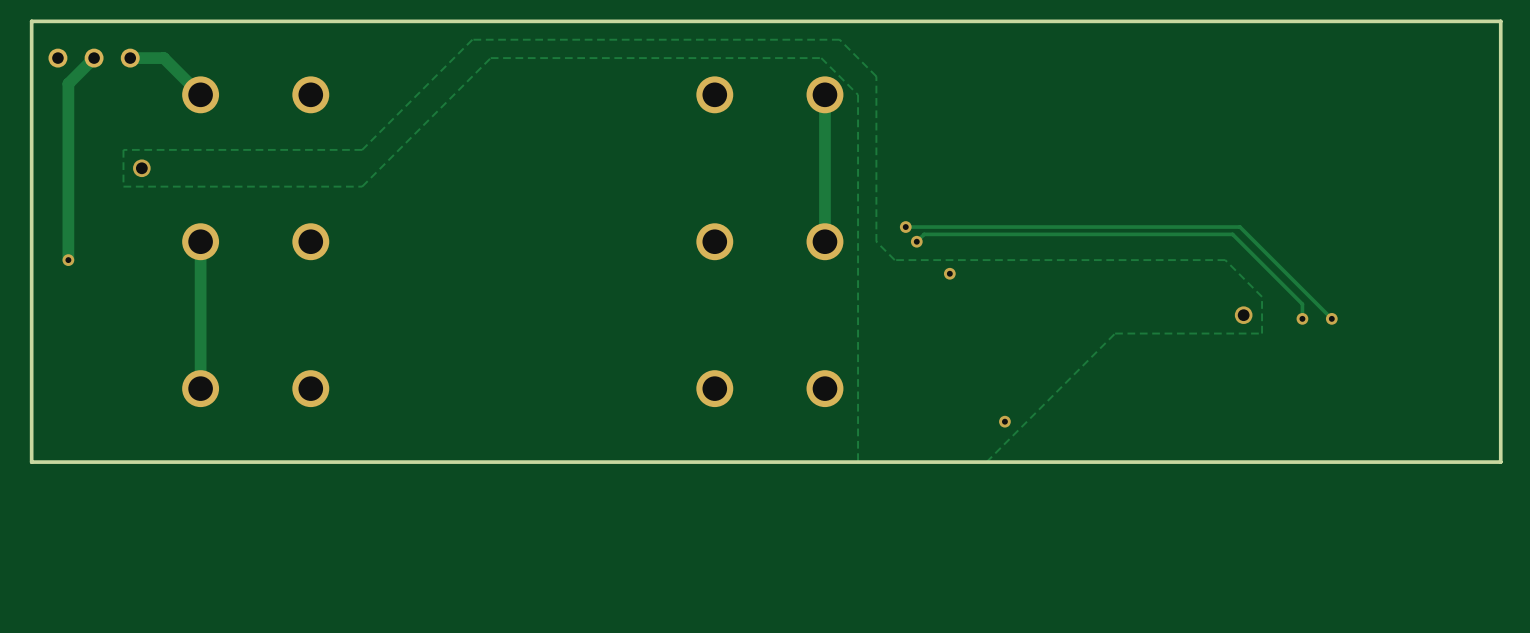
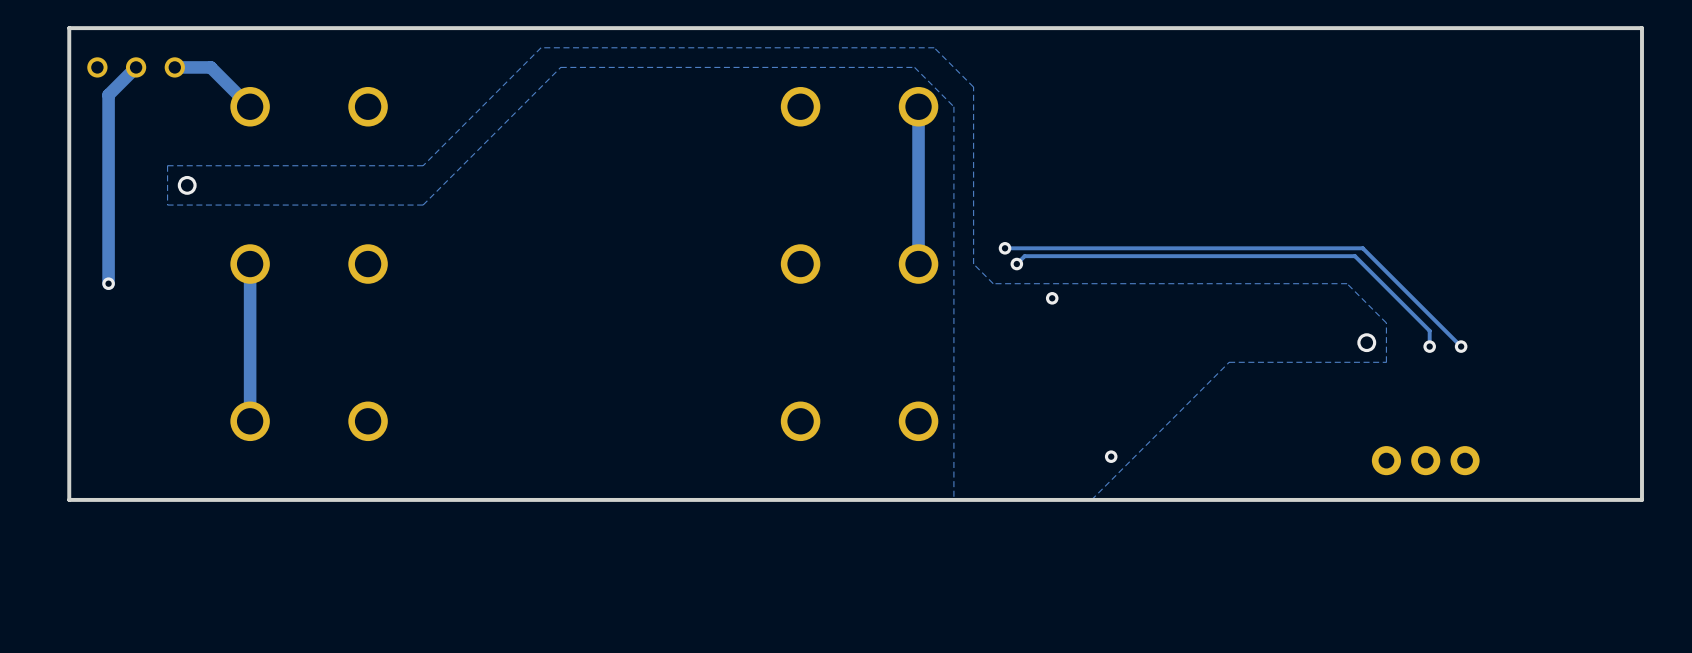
part: none -> (1425, 460)

